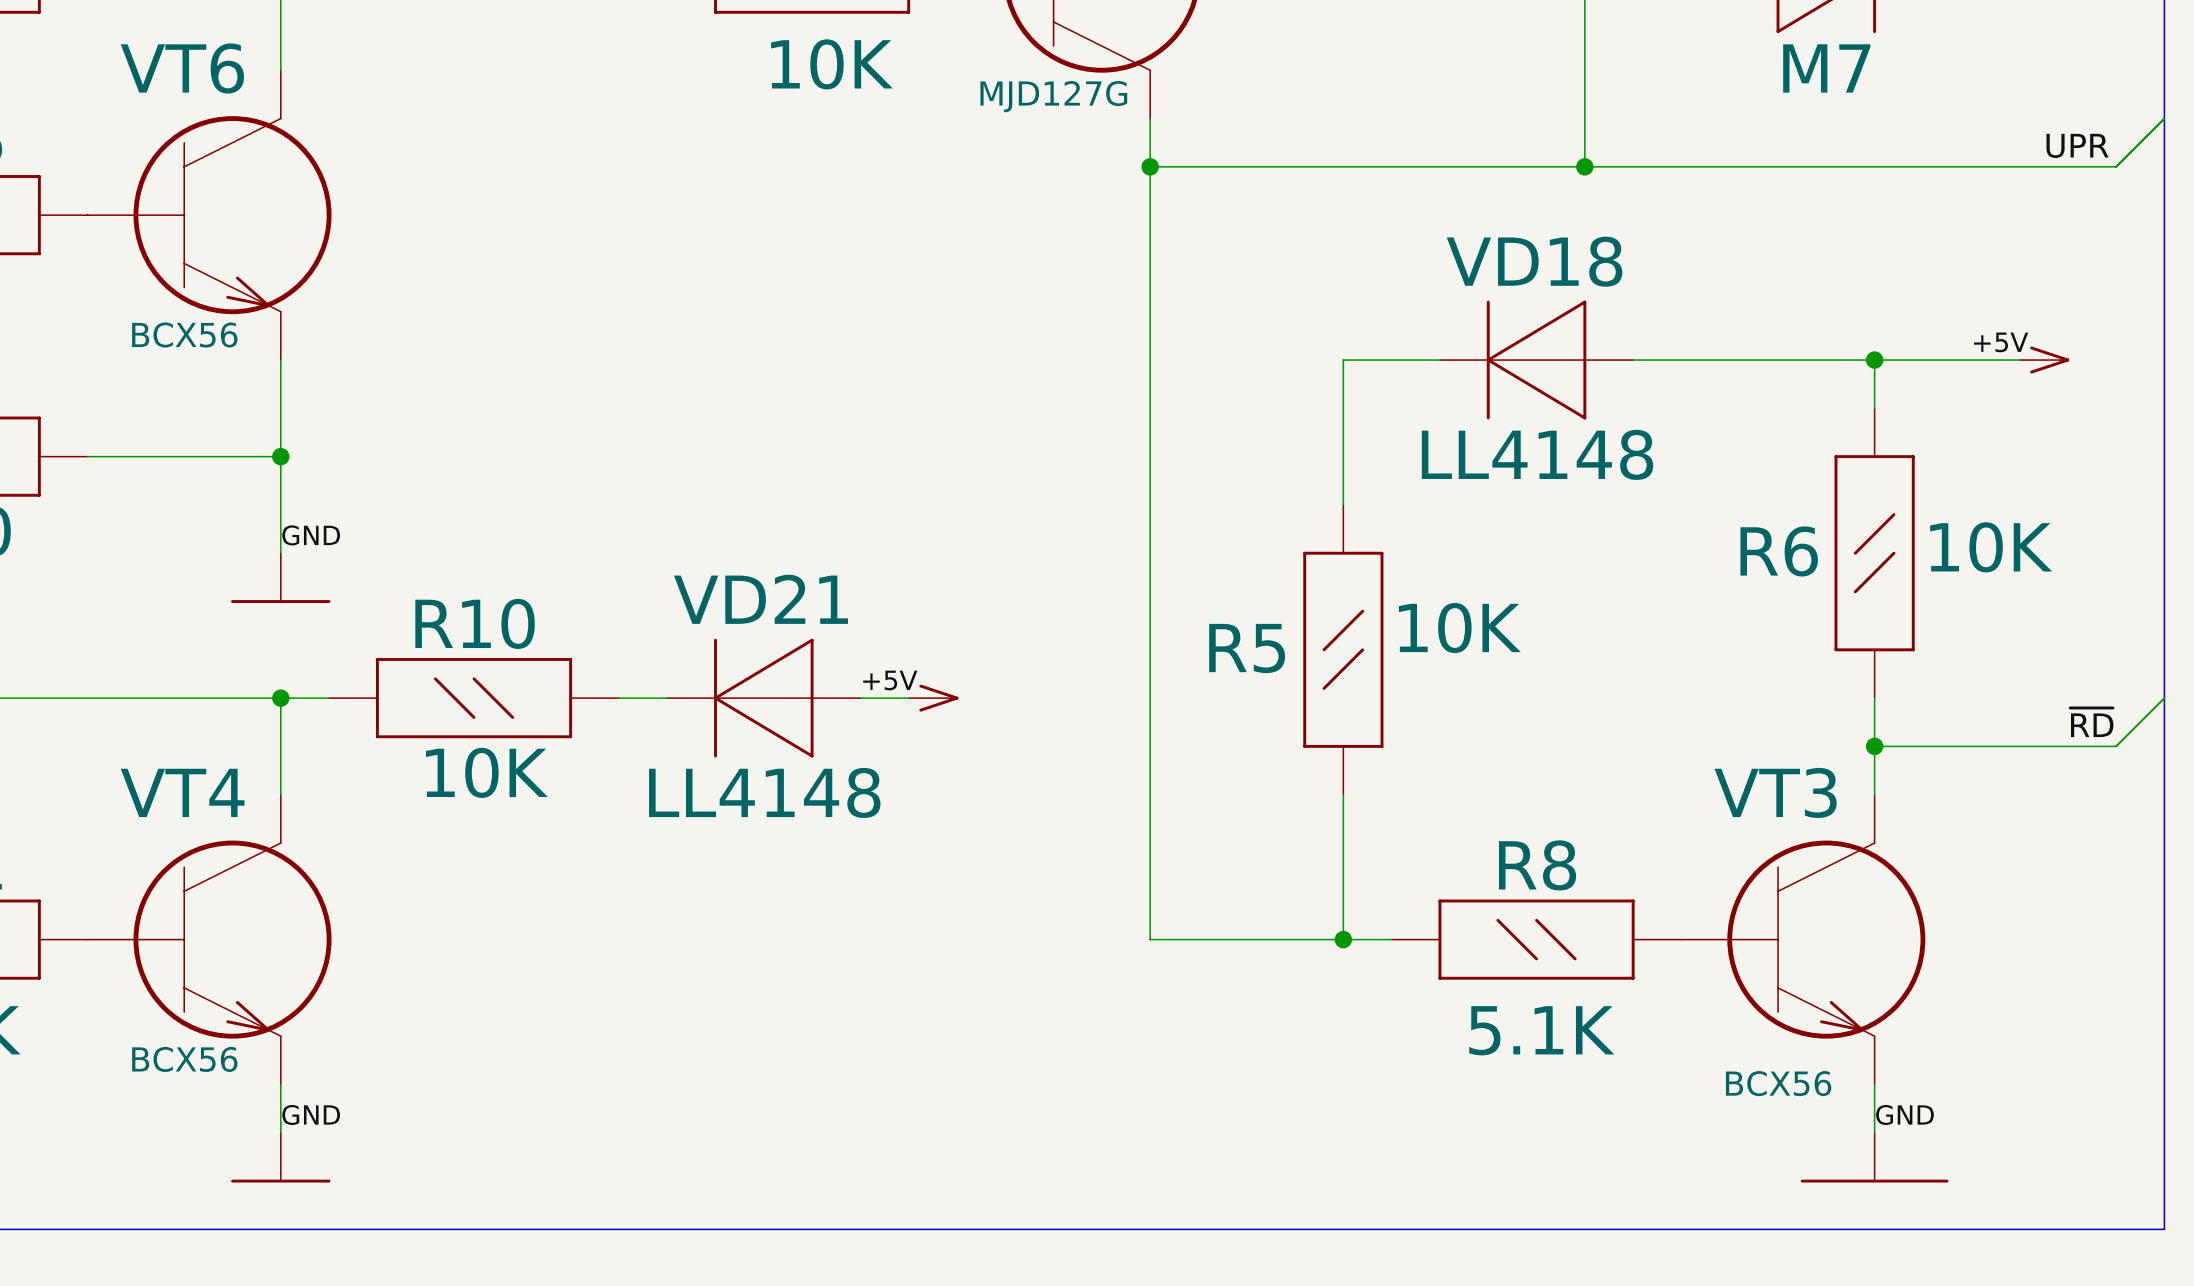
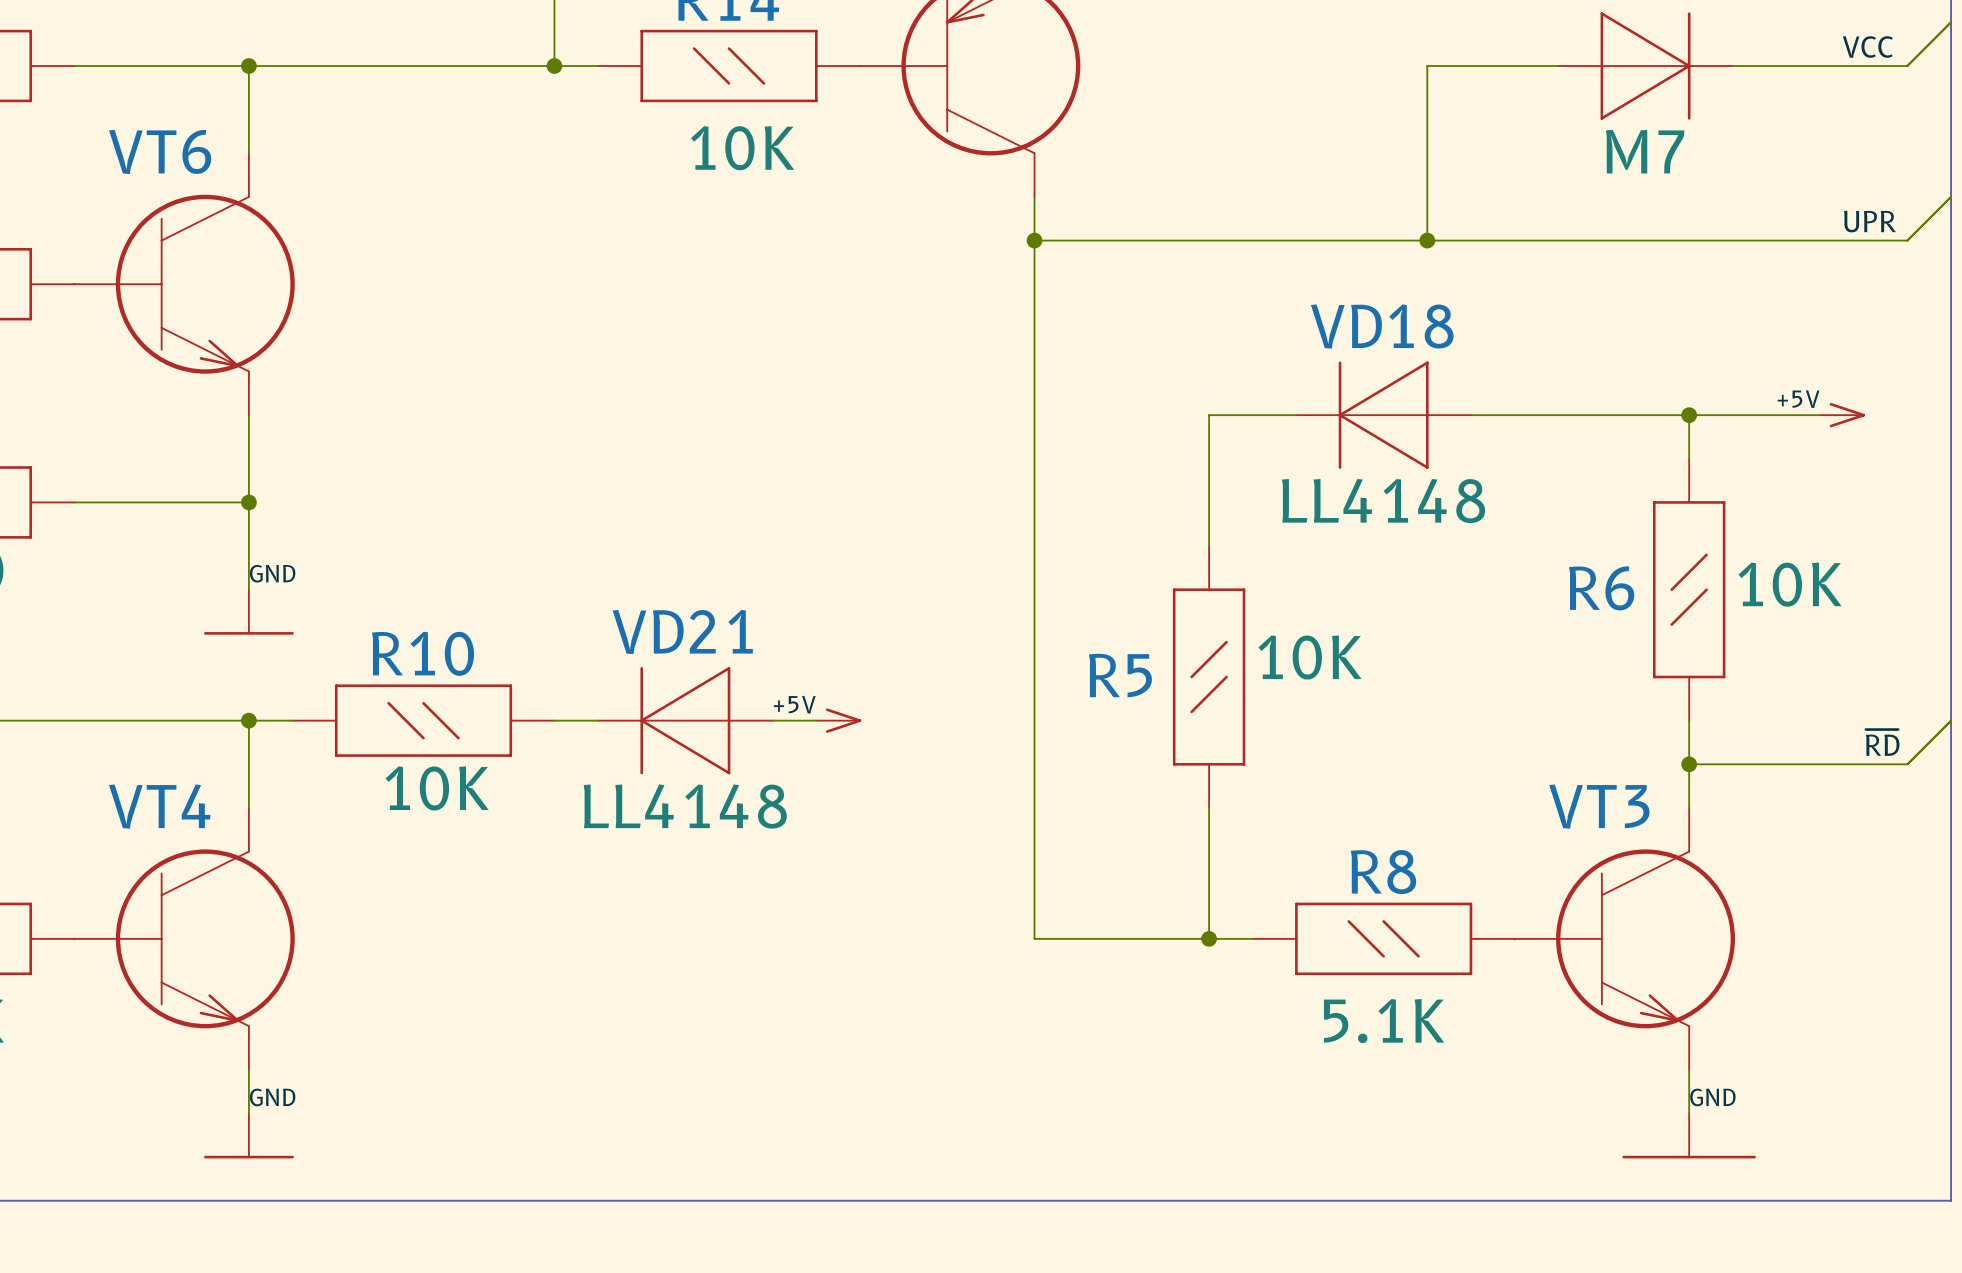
part value: MJD127G (1053, 96) -> none
VT6 value: BCX56 (184, 335) -> none
VT4 value: BCX56 (184, 1059) -> none
VT3 value: BCX56 (1778, 1083) -> none

